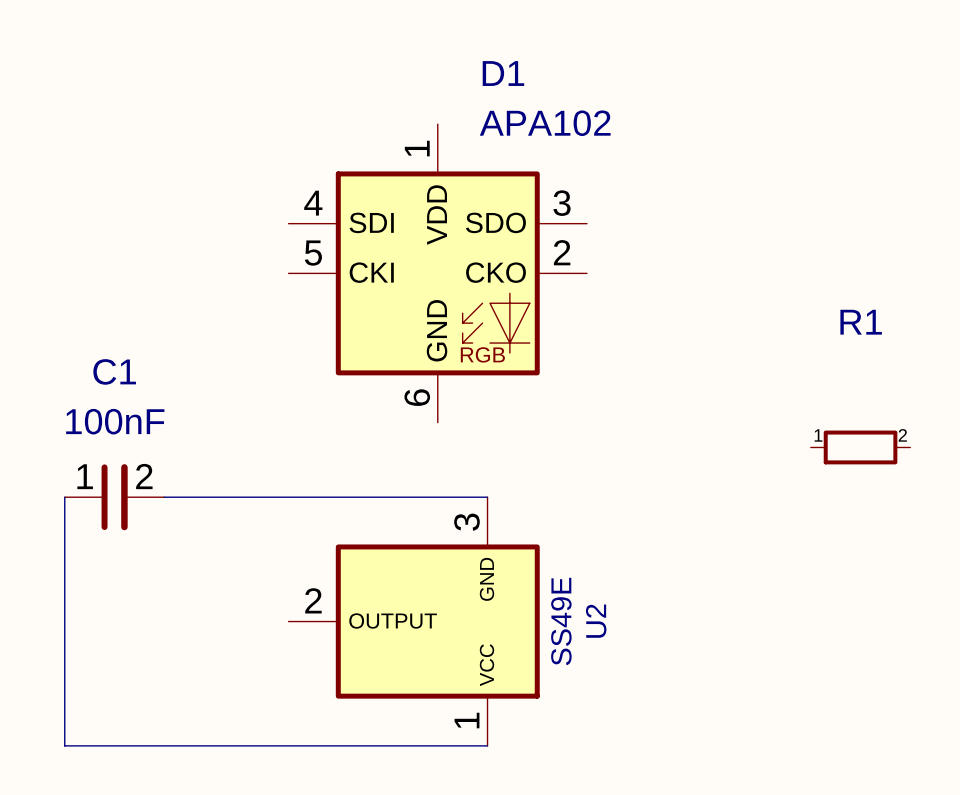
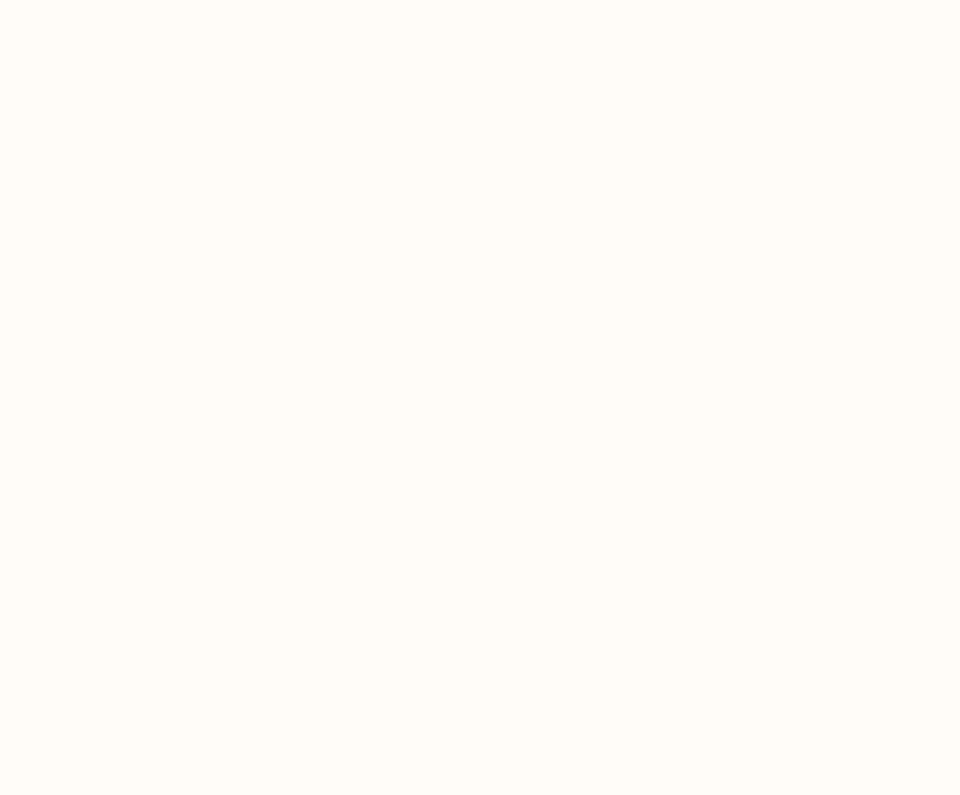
D1: APA102 (437, 273) -> none
R1: (860, 447) -> none
wire: (64, 497) (64, 745) (487, 745) -> none
C1: 100nF (114, 497) -> none
wire: (164, 497) (487, 497) -> none
U2: SS49E (414, 621) -> none

